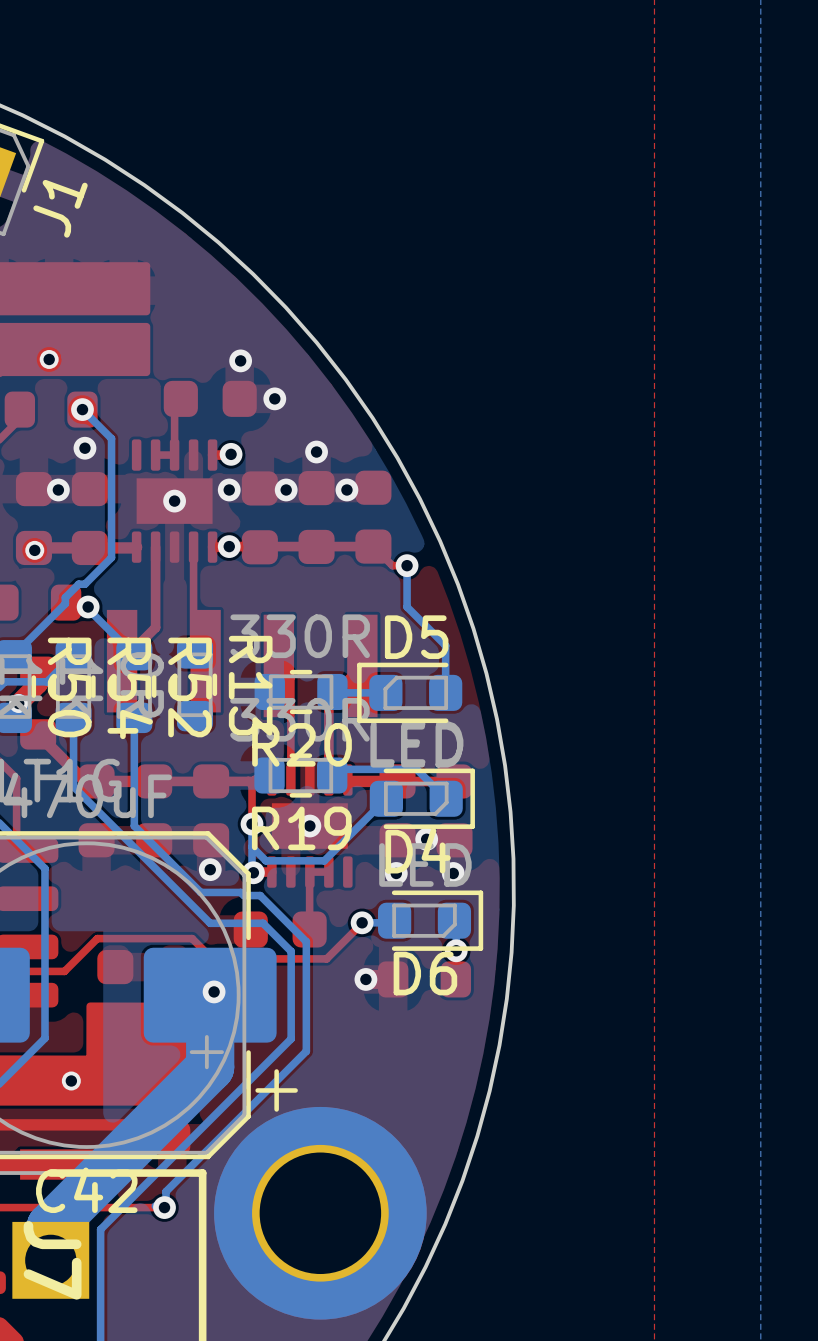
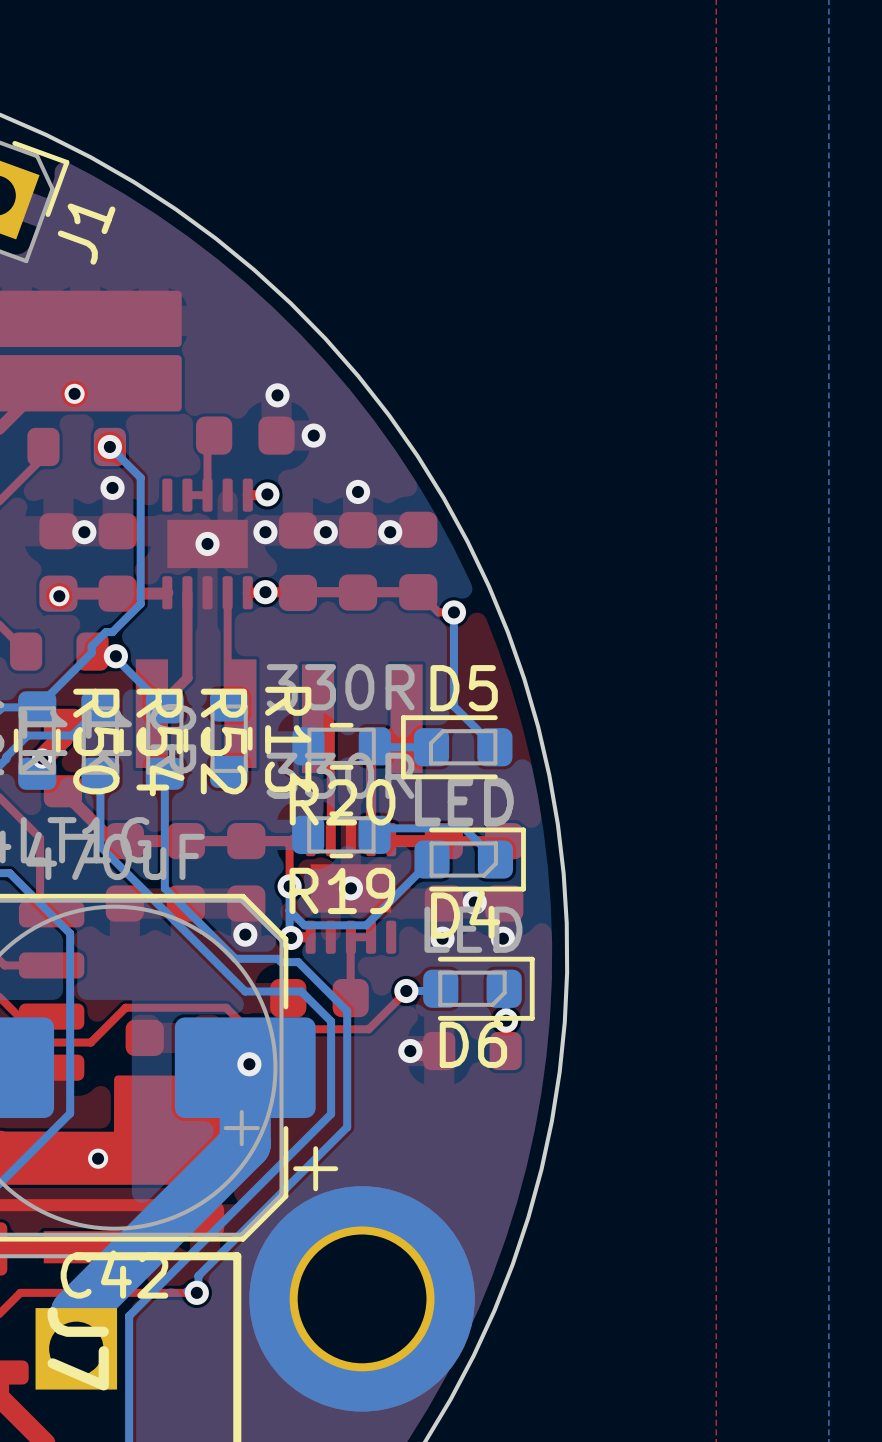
bottom track: (407, 607) (445, 645) (445, 692) -> (453, 656) (453, 706) (494, 747)

